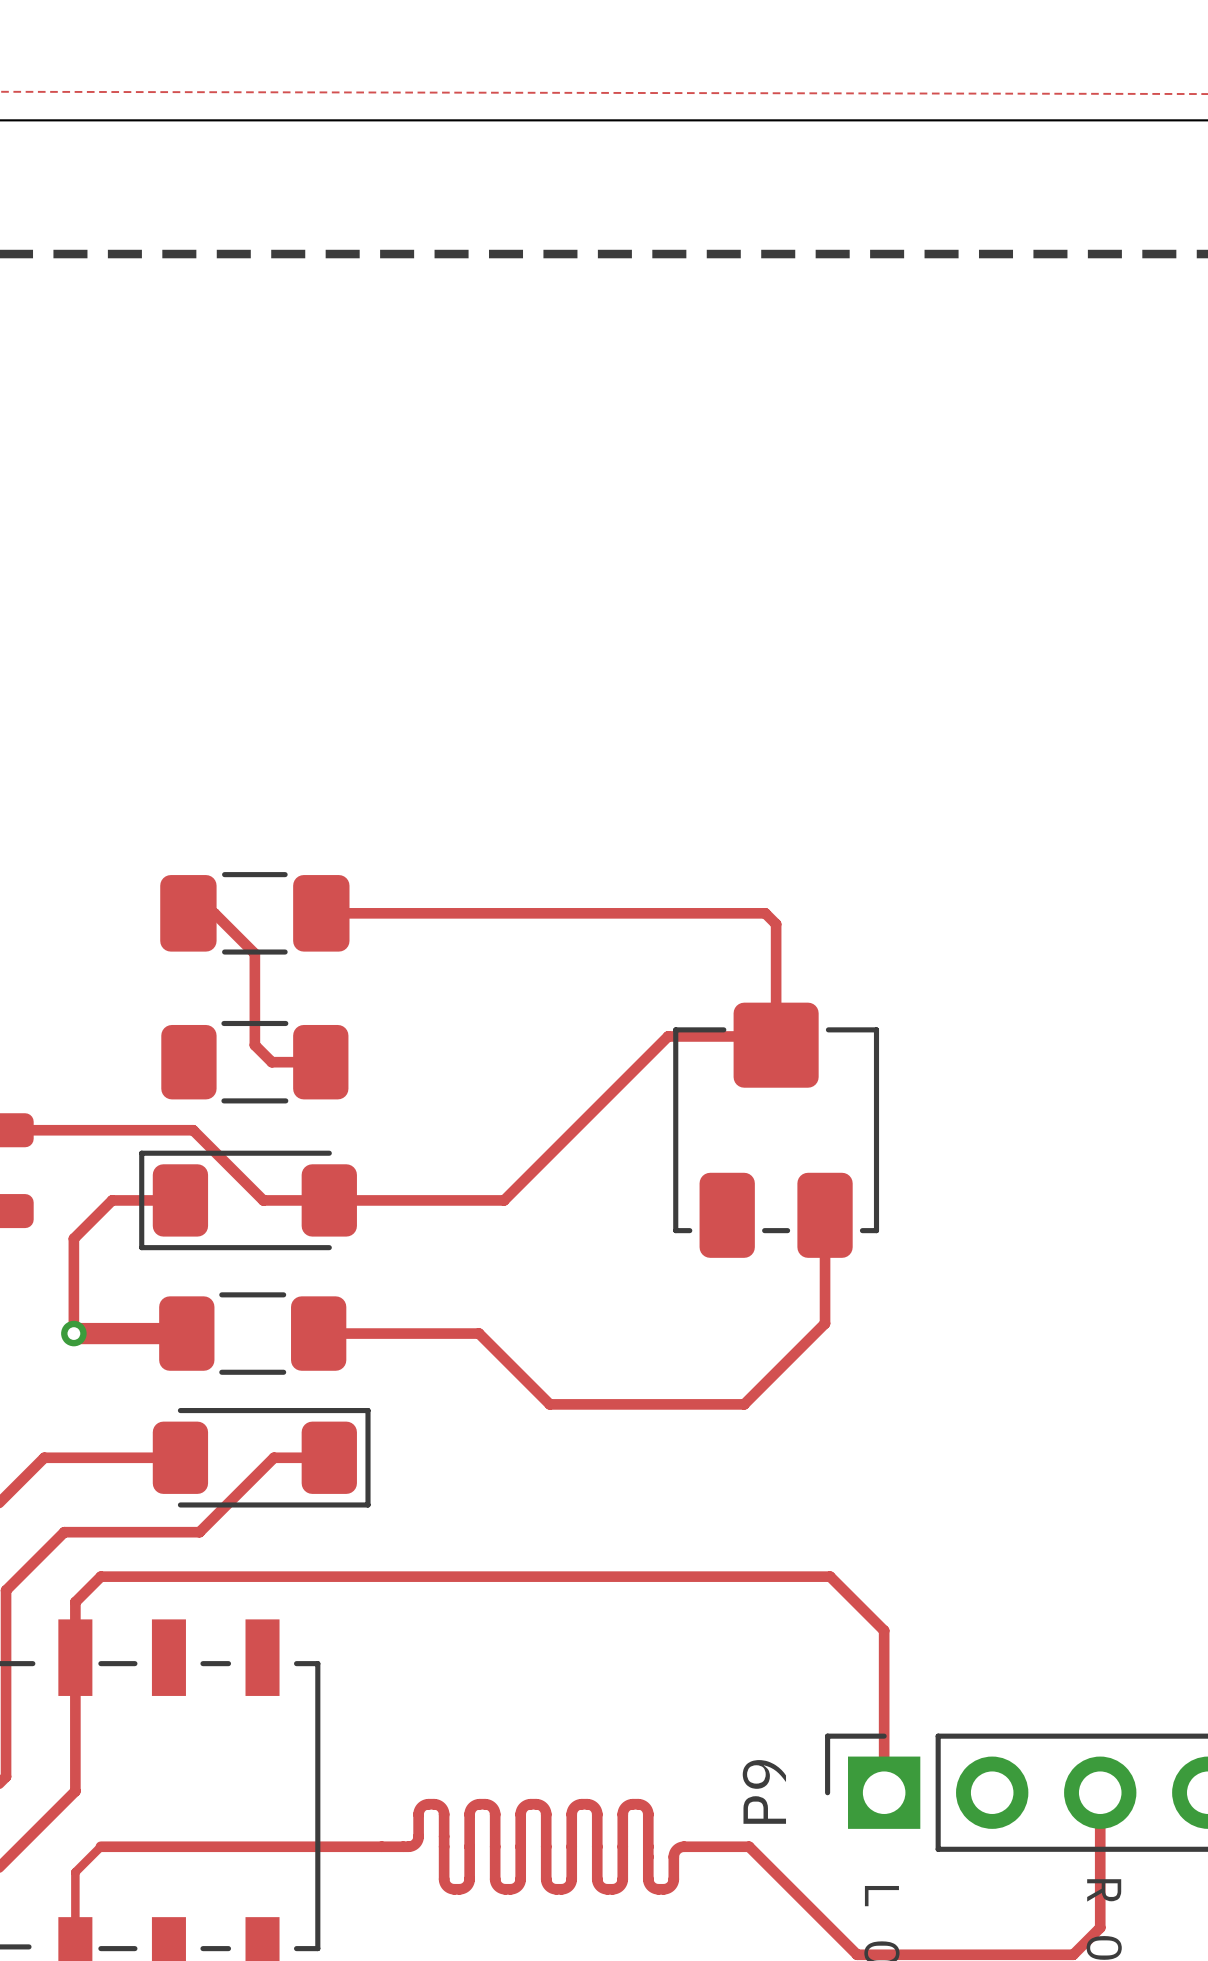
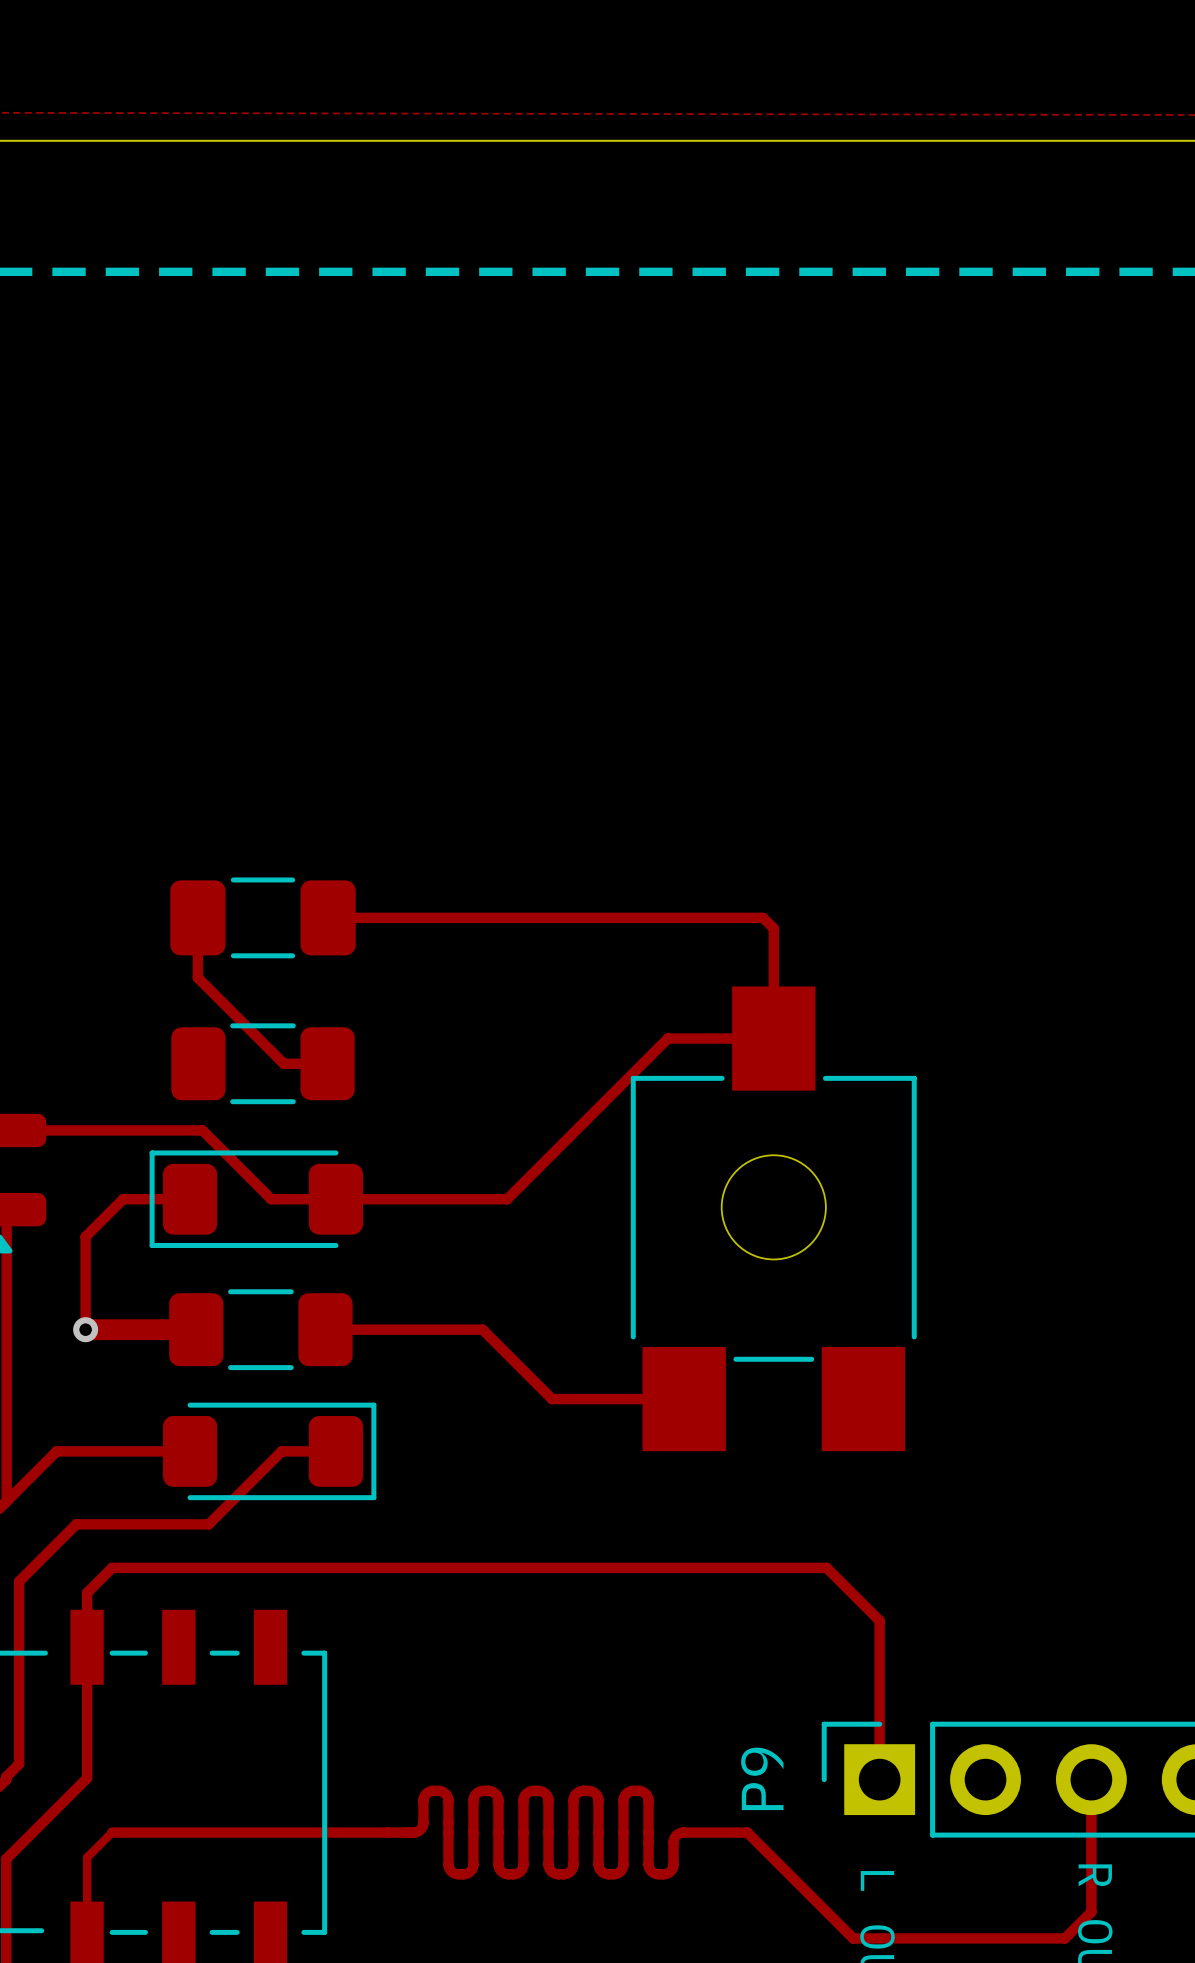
track: (188, 913) (214, 913) (254, 953) (254, 1045) (271, 1062) (276, 1062) -> (197, 917) (197, 977) (283, 1063)
part: (776, 1130) -> none
track: (825, 1215) (825, 1323) (744, 1404) (684, 1404) -> none
part: none -> (773, 1218)

